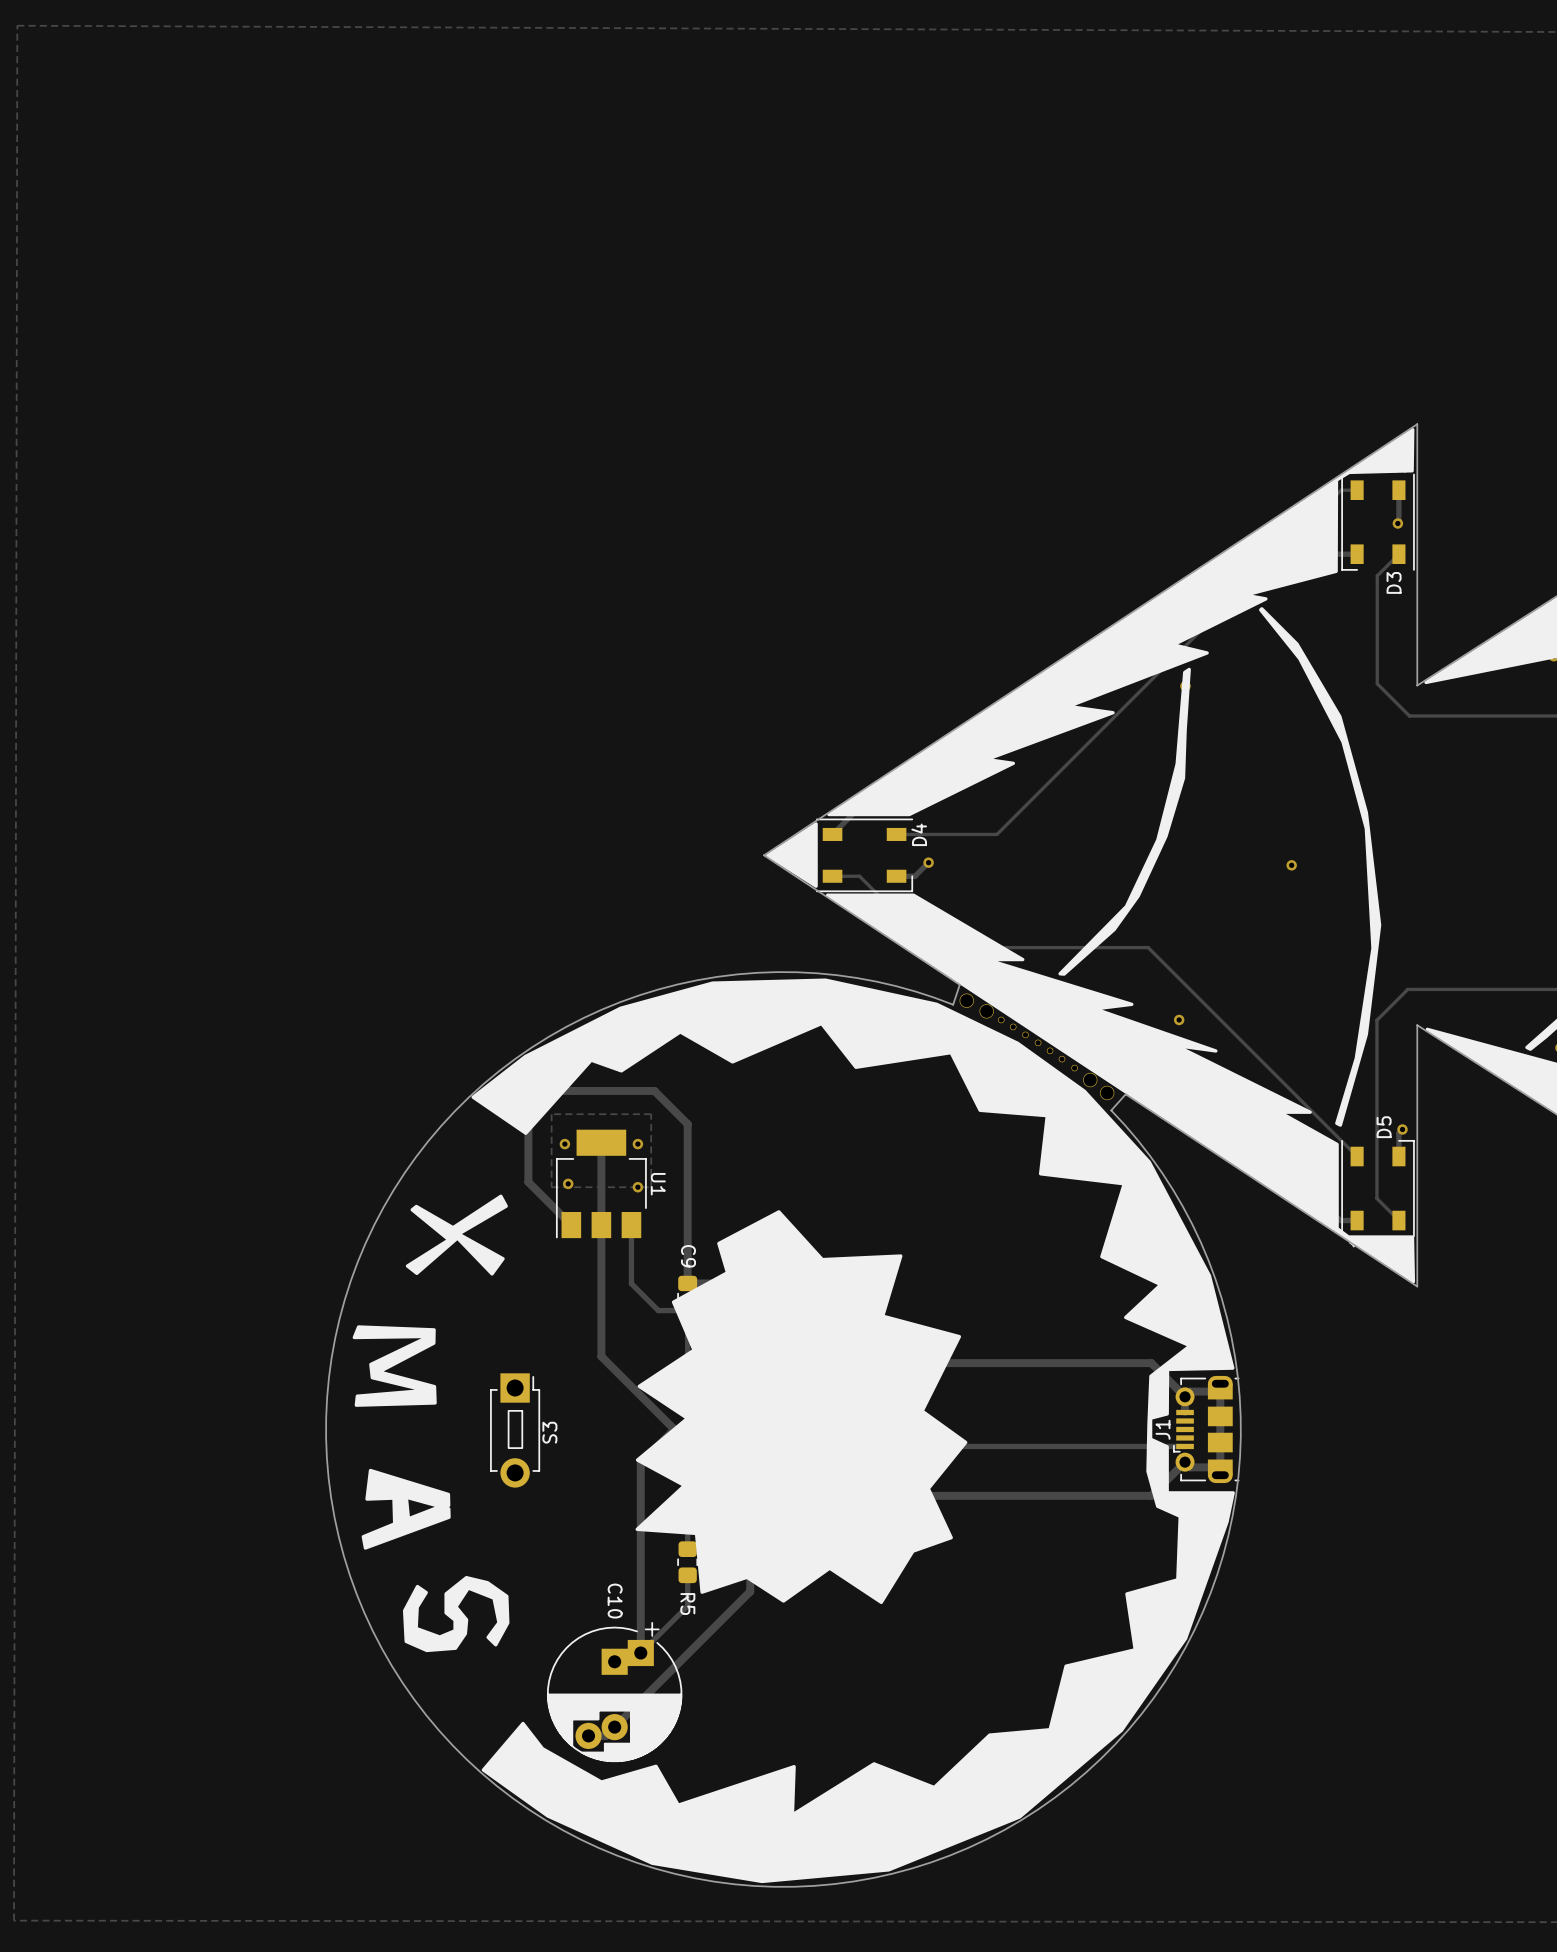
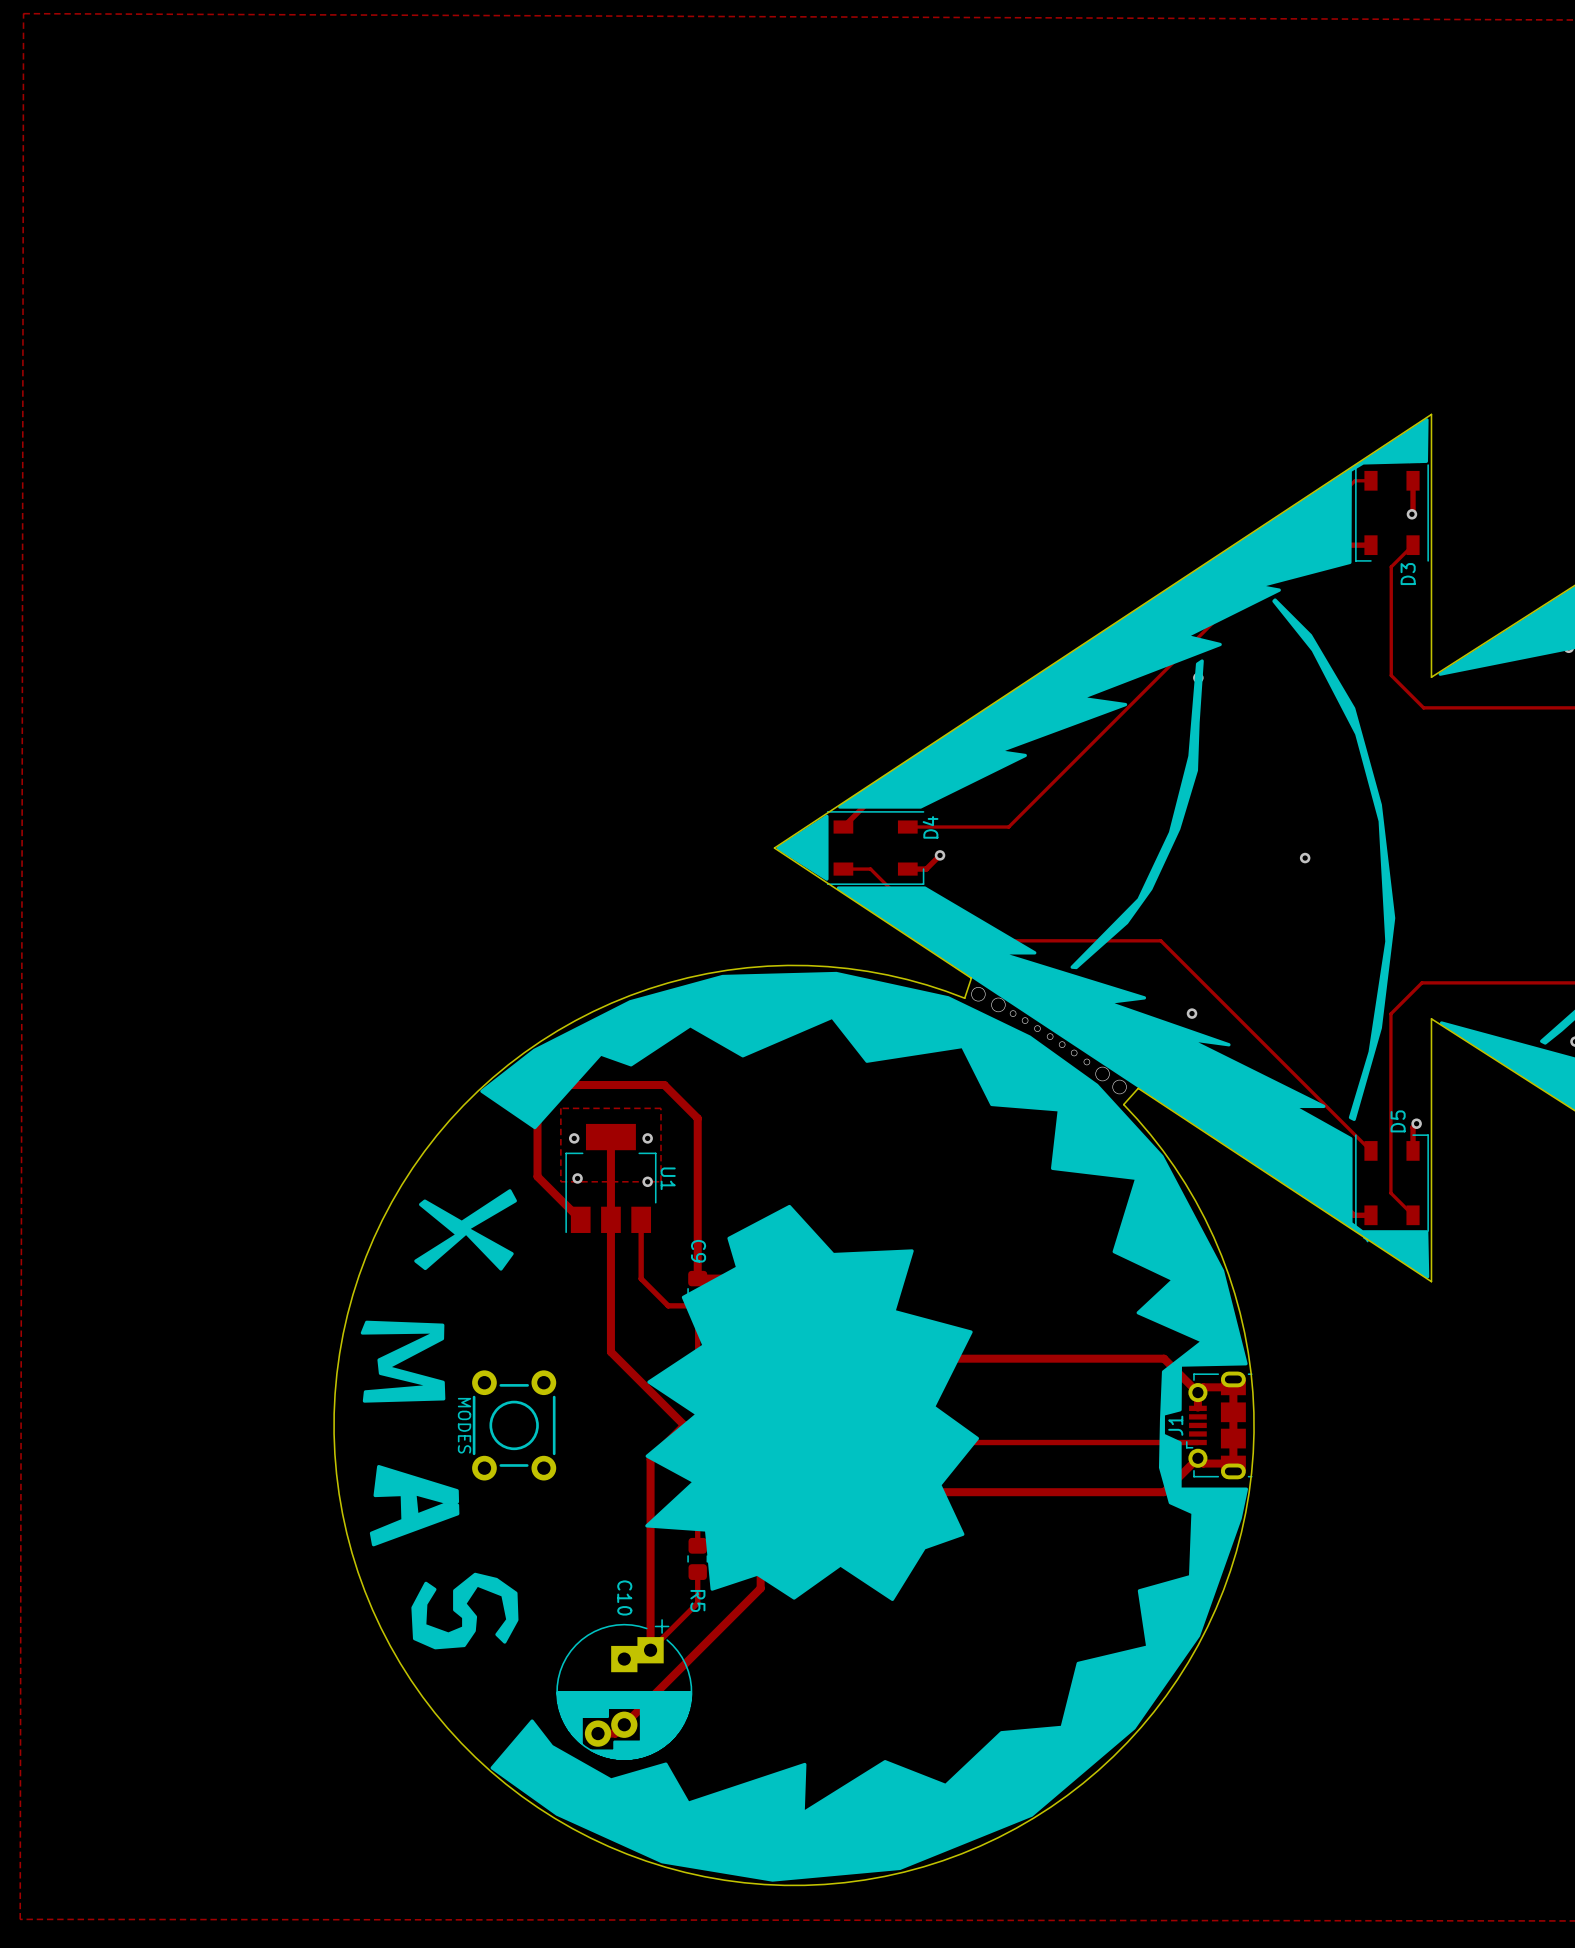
part: none -> MODES (514, 1425)
S3: (515, 1430) -> none

